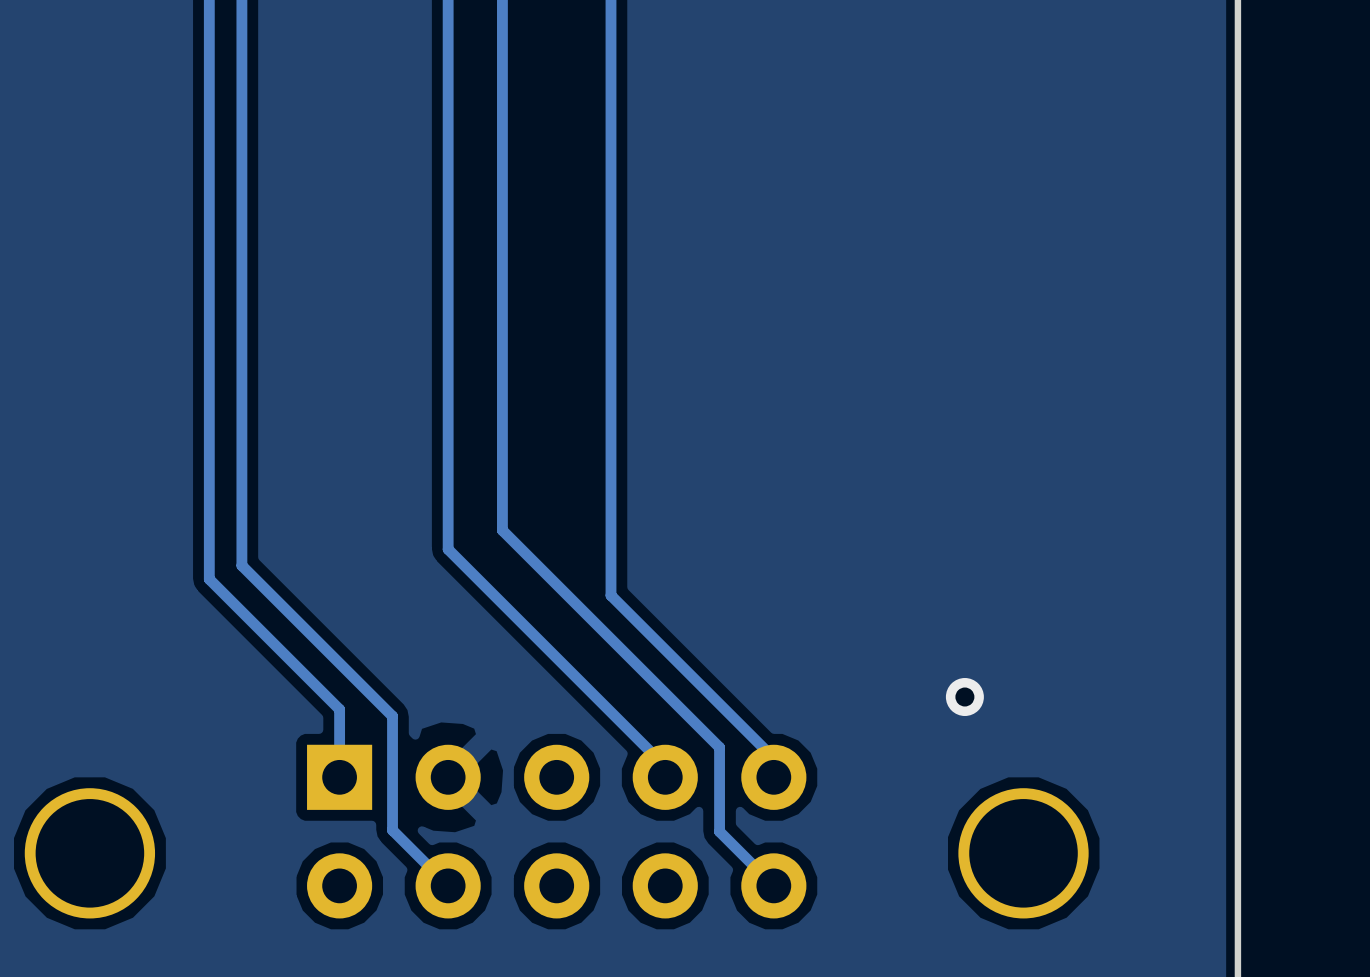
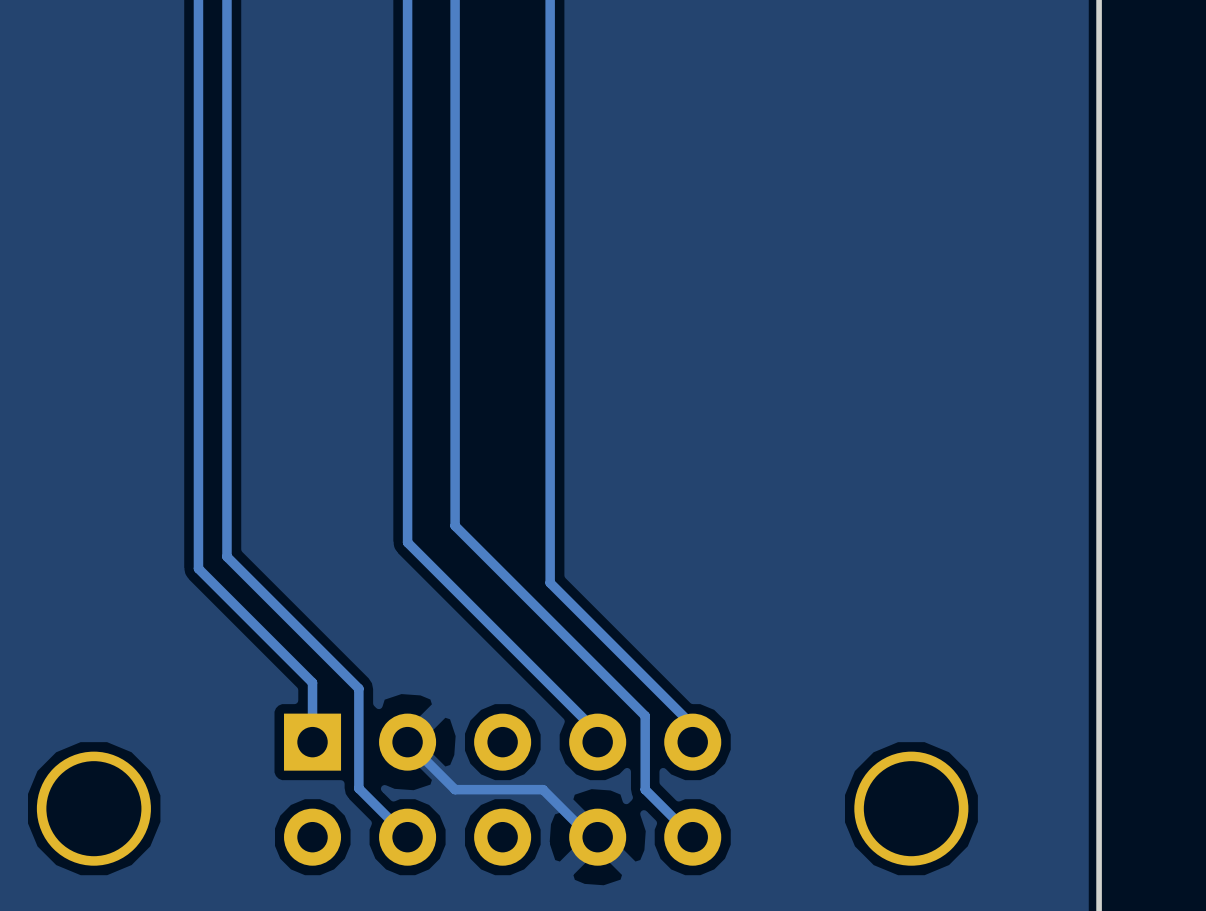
via: (964, 697) -> none
track: none -> (407, 742) (455, 789) (543, 789) (590, 837) (597, 837)

